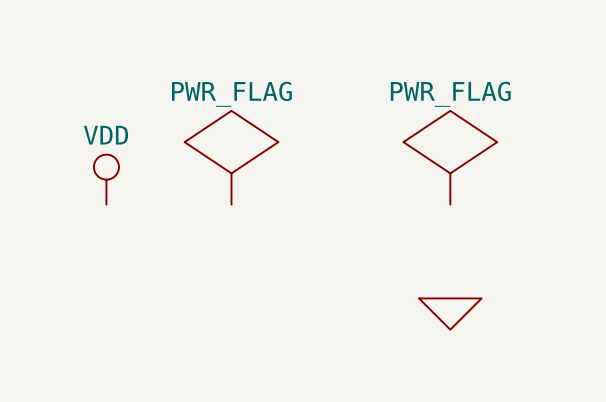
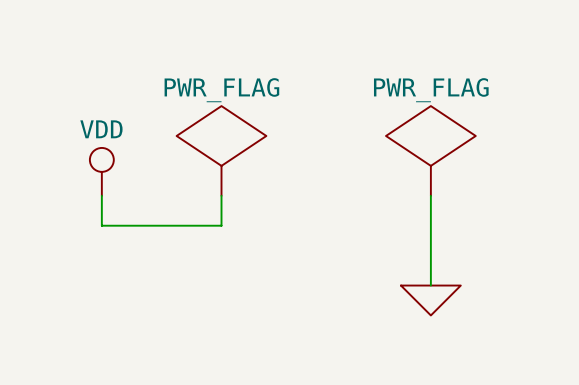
wire: none -> (101, 195) (101, 225) (221, 225) (221, 195)
wire: none -> (430, 195) (430, 285)

